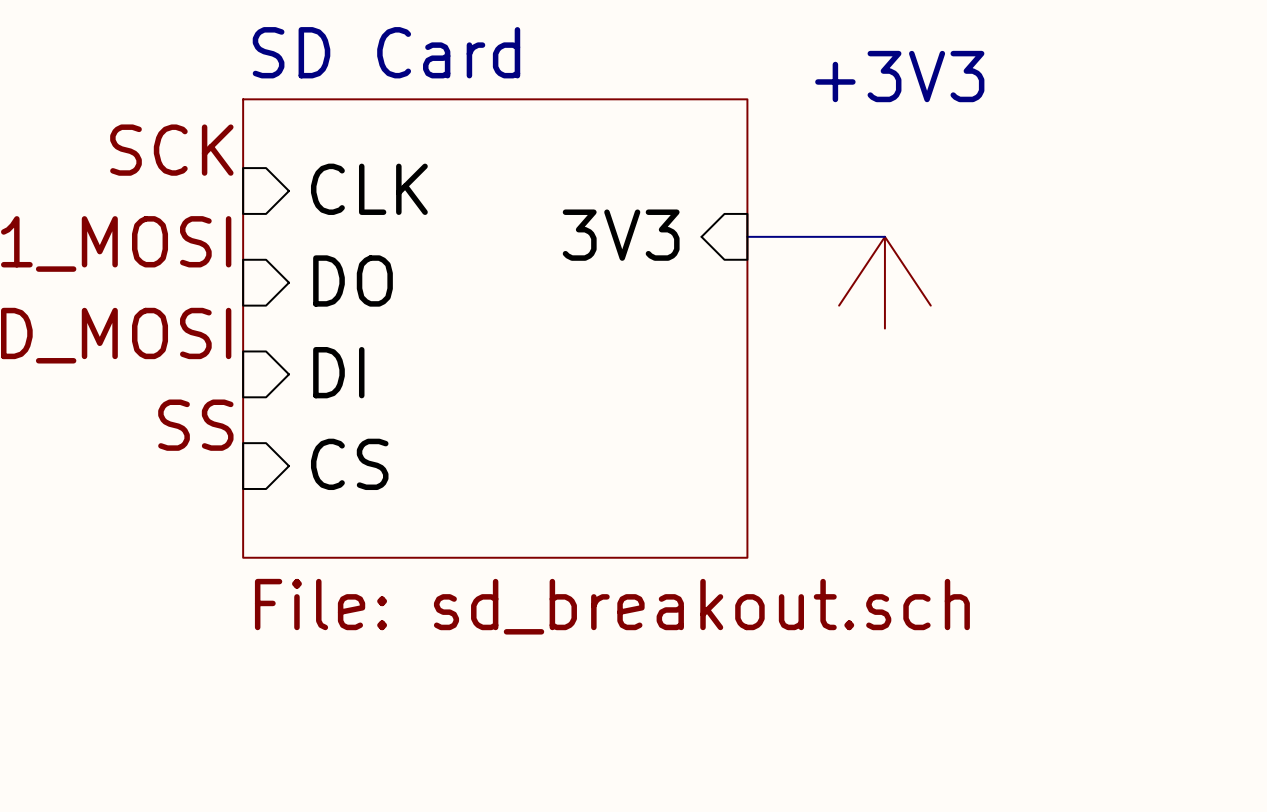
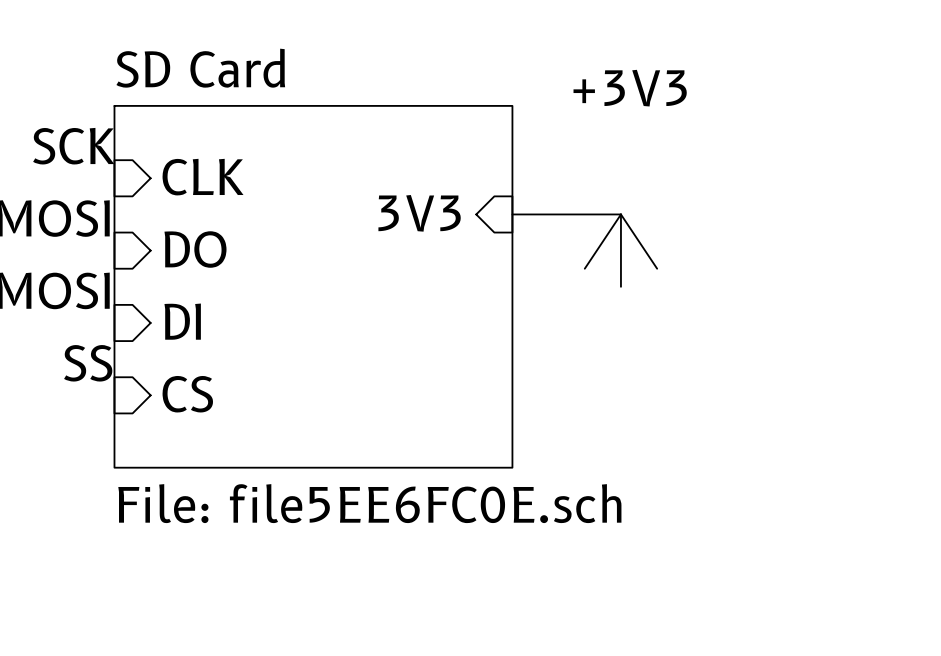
sheet SD Card value: File: sd_breakout.sch (612, 606) -> File: file5EE6FC0E.sch (369, 503)

